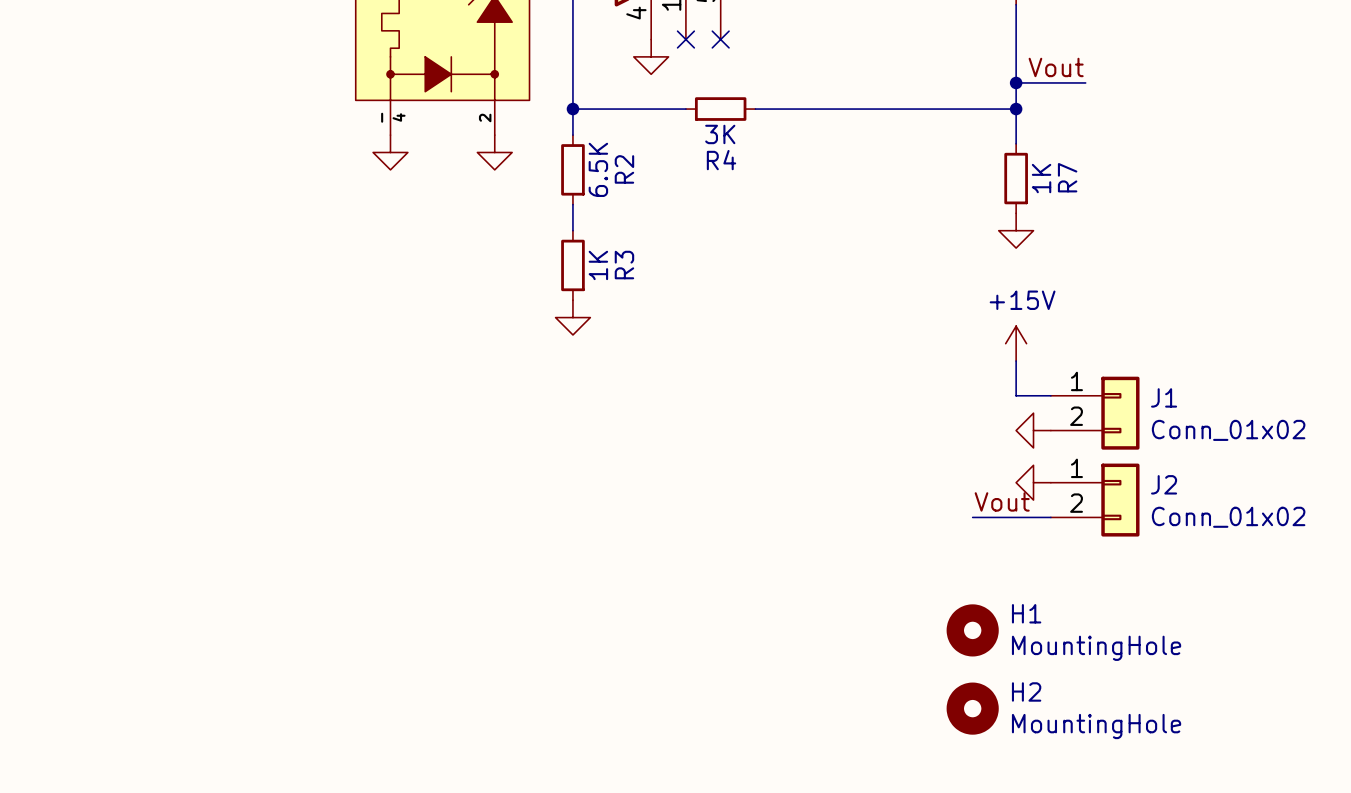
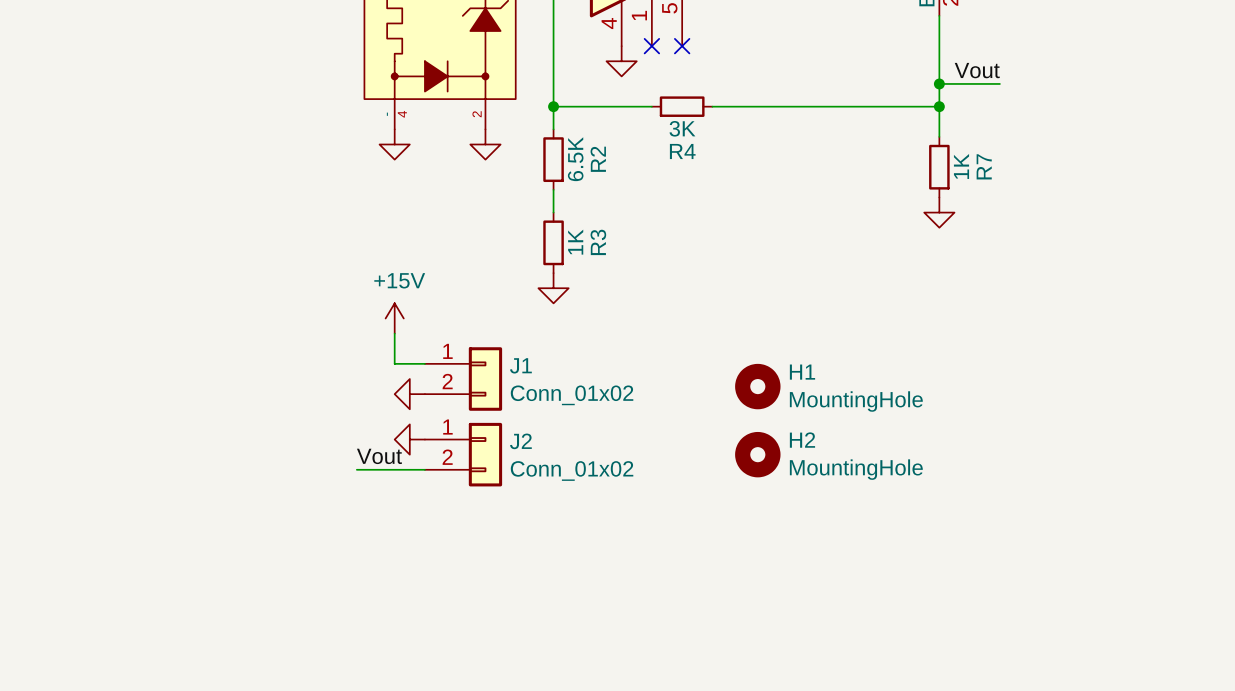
power symbol: +15V (1016, 343) -> none
power symbol: none -> +15V (394, 318)
wire: (1016, 361) (1016, 395) (1050, 395) -> none
wire: none -> (394, 333) (394, 363) (424, 363)
J1 position: (1095, 413) -> (463, 379)
power symbol: (1033, 430) -> none
power symbol: none -> (409, 394)
power symbol: (1033, 482) -> none
power symbol: none -> (409, 439)
J2 position: (1095, 500) -> (463, 454)
label: Vout (1002, 501) -> none
label: none -> Vout (379, 456)
wire: (972, 517) (1050, 517) -> none
wire: none -> (356, 469) (424, 469)
H1 position: (972, 630) -> (757, 386)
H2 position: (972, 708) -> (757, 454)

